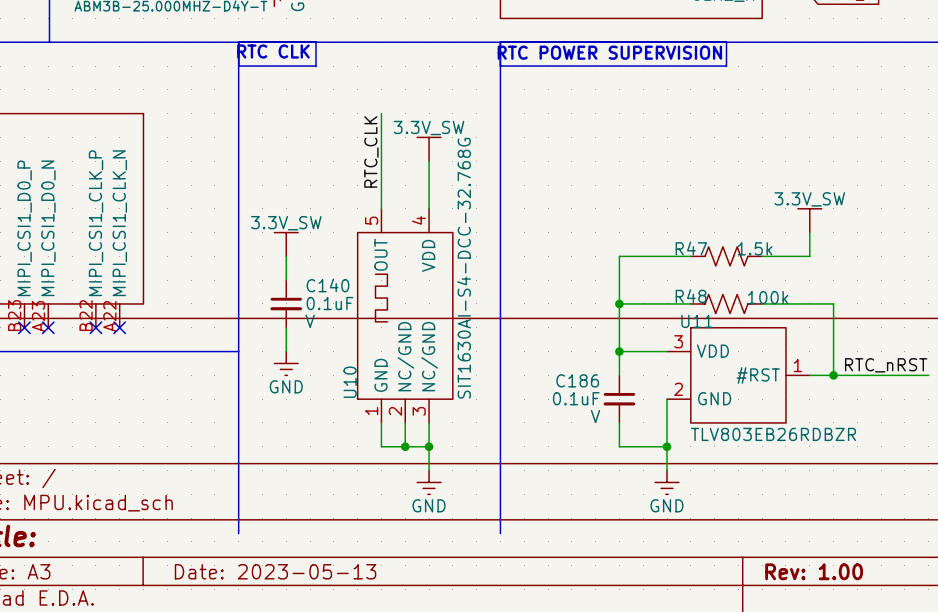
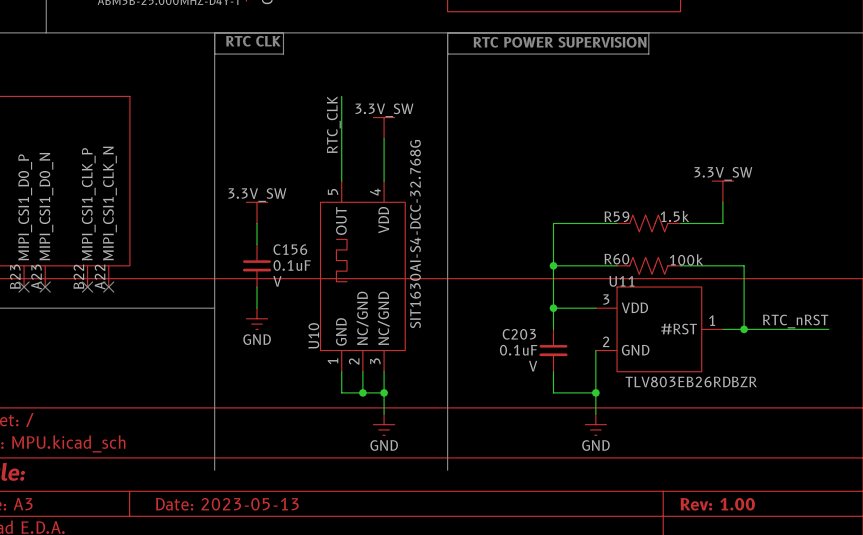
R47 name: R47 (691, 248) -> R59 (616, 216)
C140 name: C140 (327, 285) -> C156 (290, 249)
R48 name: R48 (691, 296) -> R60 (616, 259)
C186 name: C186 (577, 380) -> C203 (519, 334)

